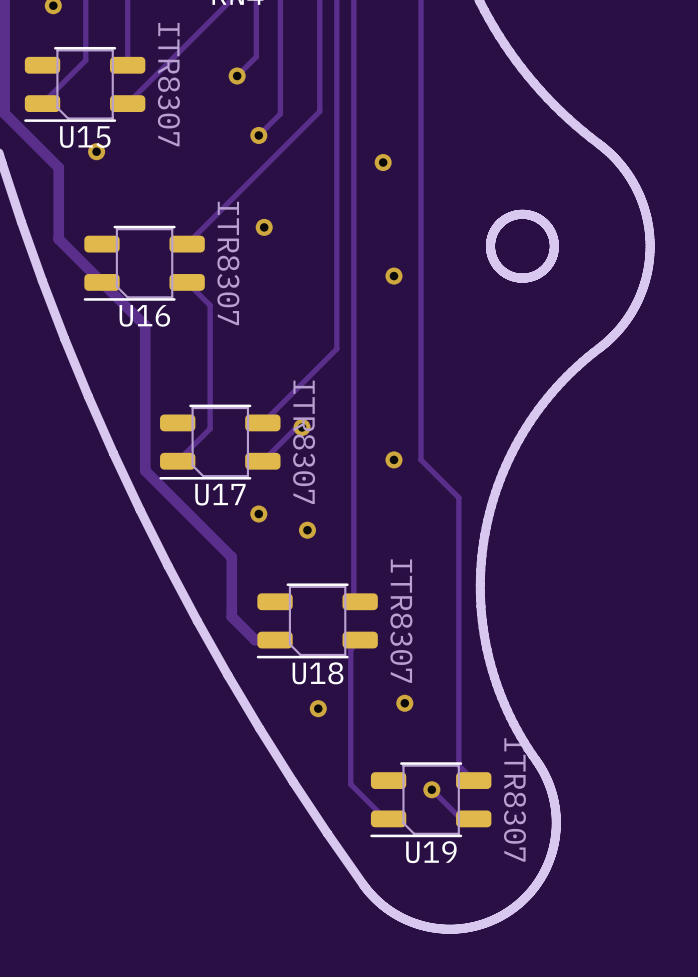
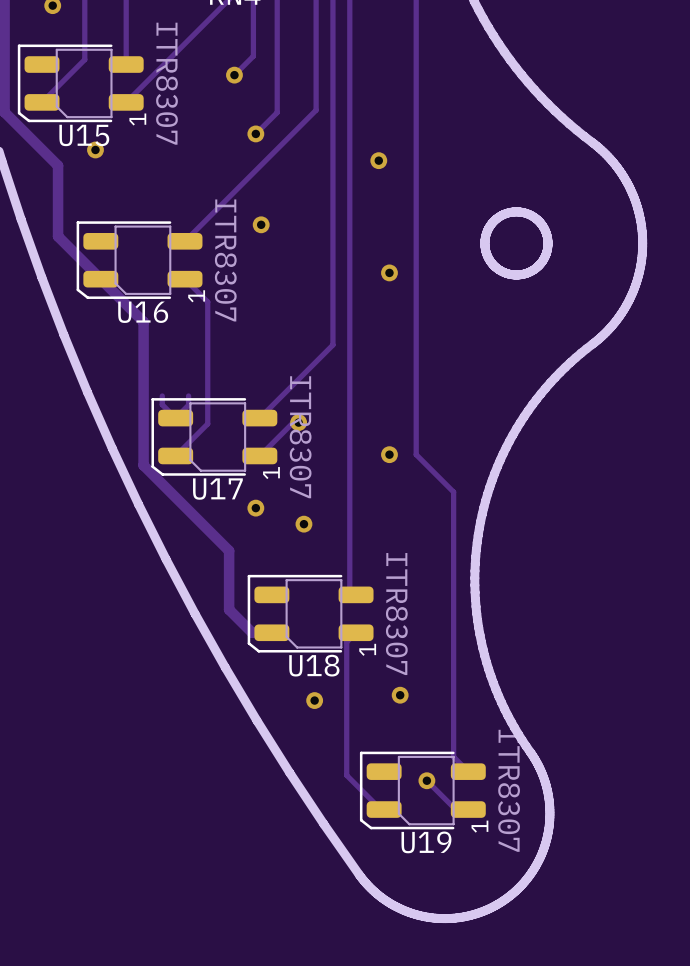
U15 footprint: [24, 46, 146, 122] -> [17, 44, 144, 123]
U16 footprint: [83, 225, 205, 301] -> [76, 221, 203, 299]
track: none -> (188, 395) (188, 405) (175, 418) (162, 404) (162, 395)
U17 footprint: [159, 404, 281, 480] -> [151, 398, 278, 476]
U18 footprint: [256, 583, 378, 659] -> [247, 574, 374, 653]
U19 footprint: [370, 762, 492, 838] -> [359, 751, 486, 830]

